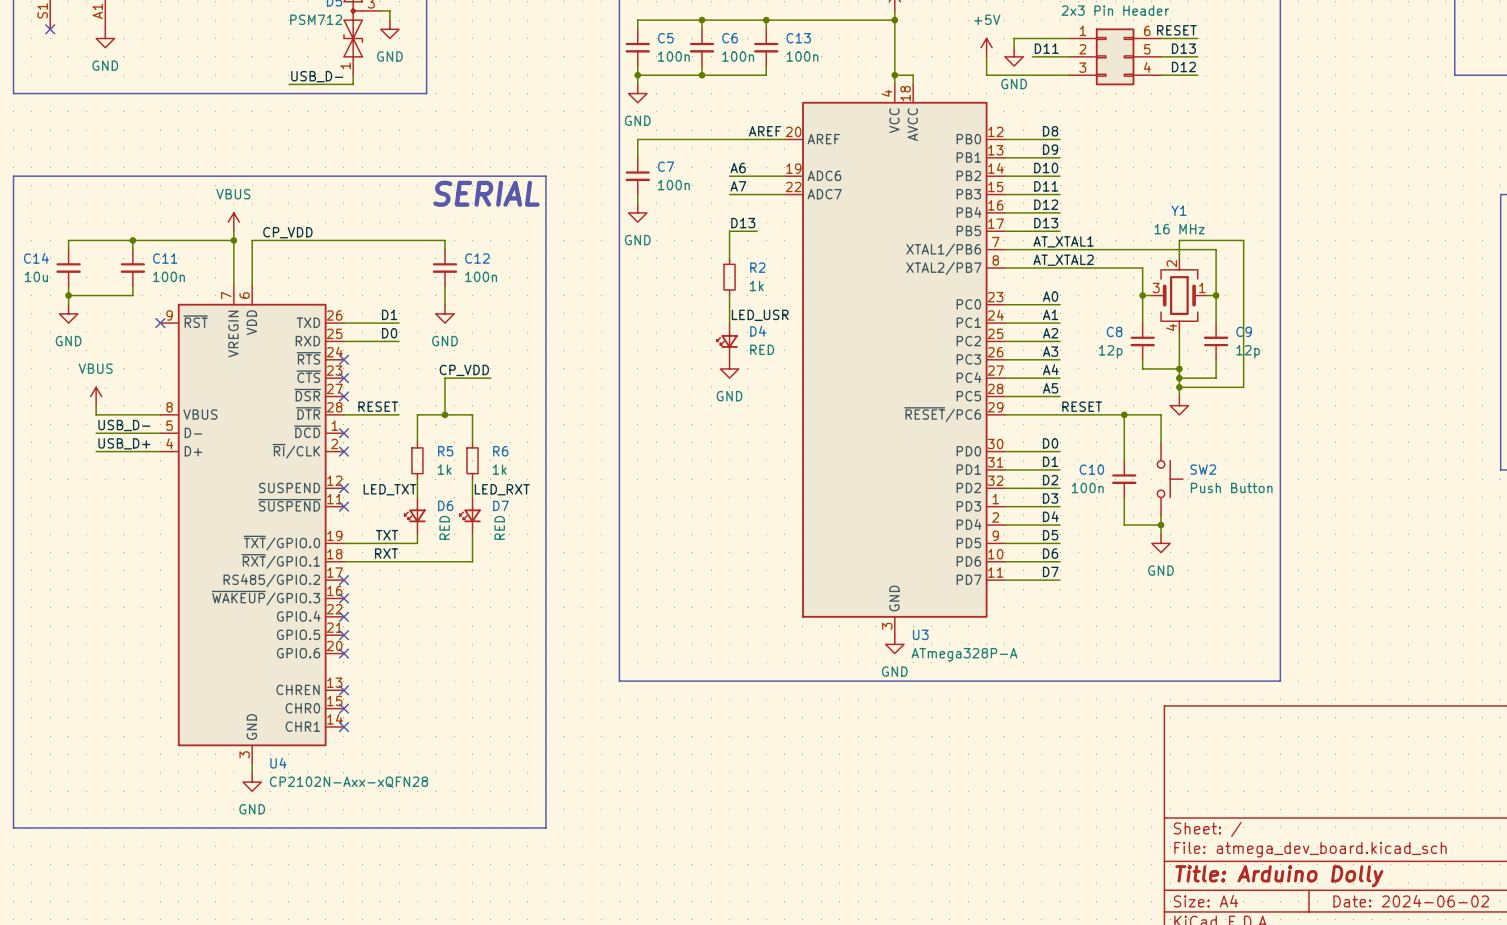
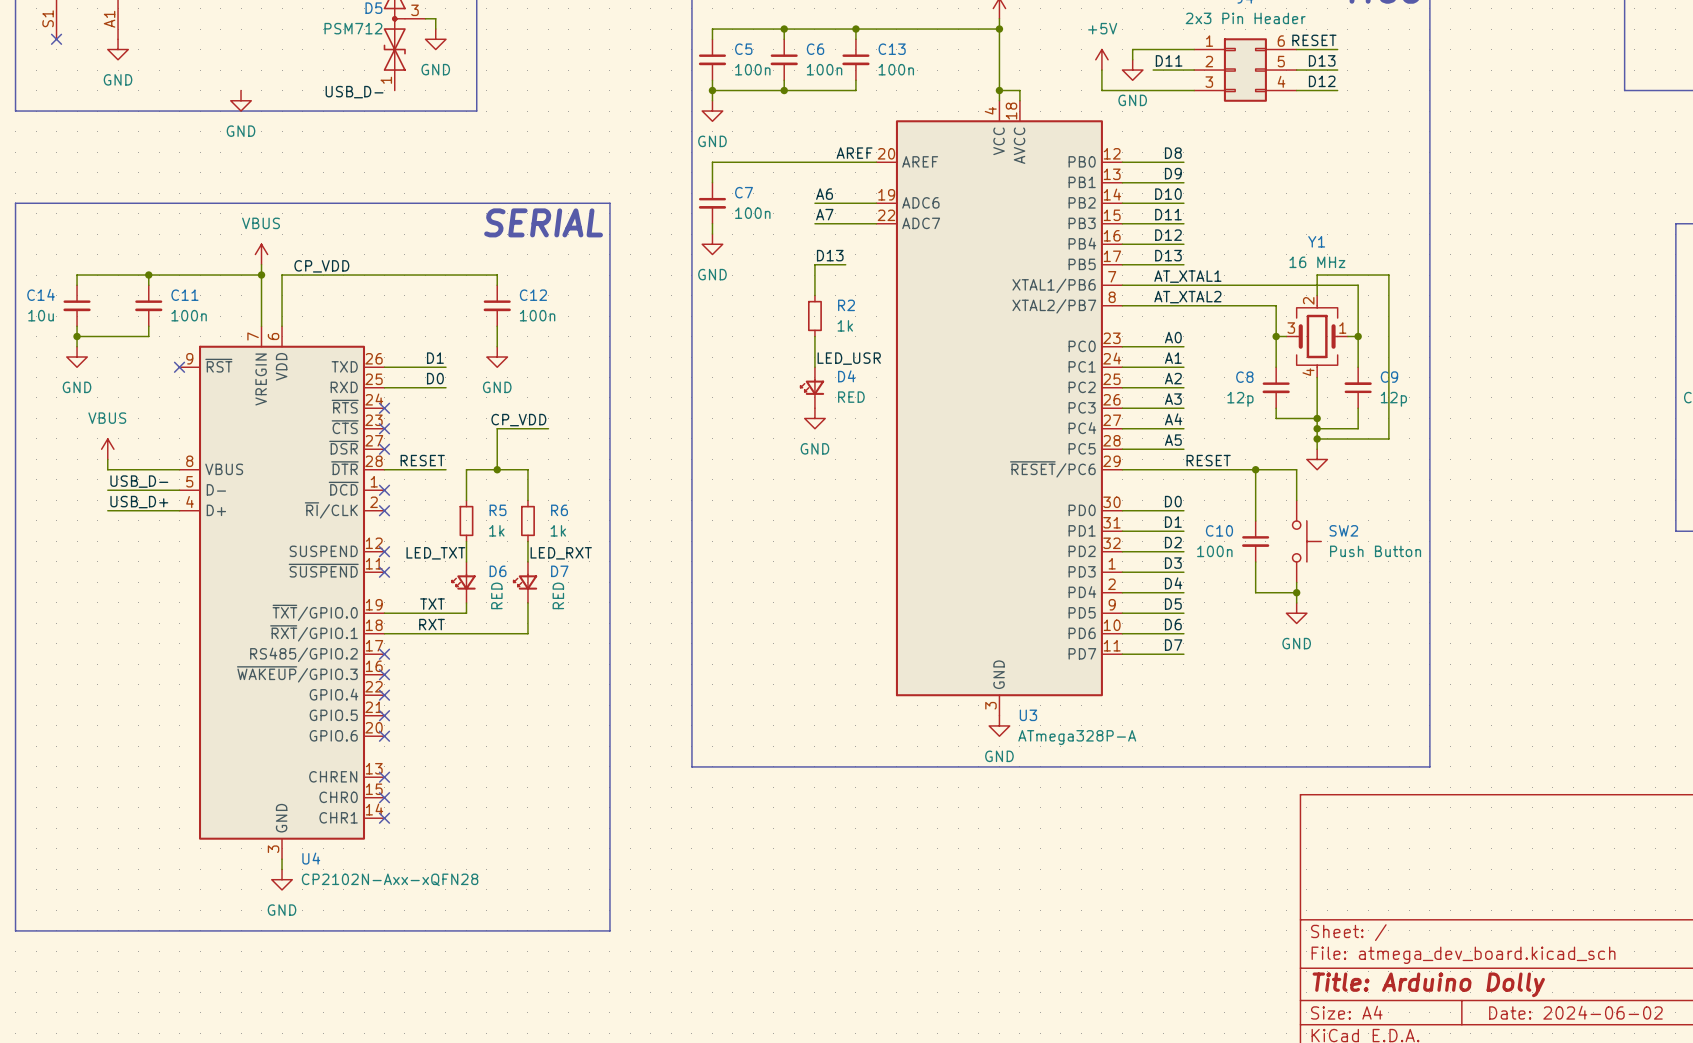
wire: (353, 75) (353, 84) (288, 84) -> none
power symbol: none -> GND (241, 100)

